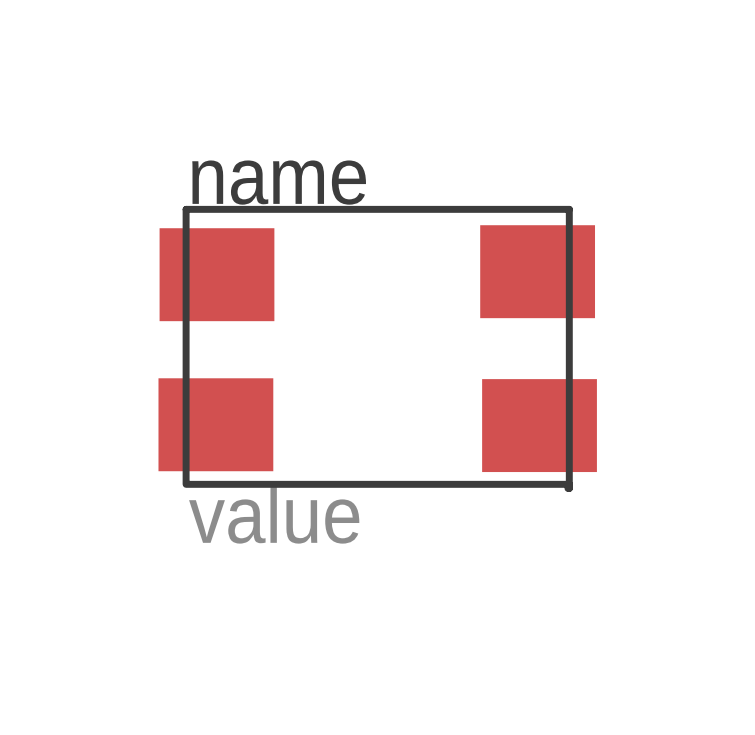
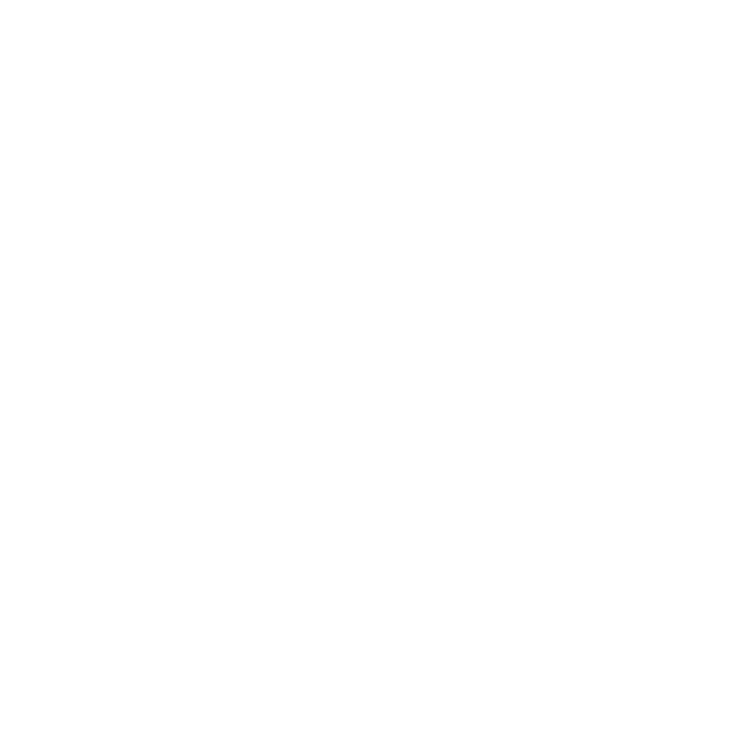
part: (377, 348) -> none

